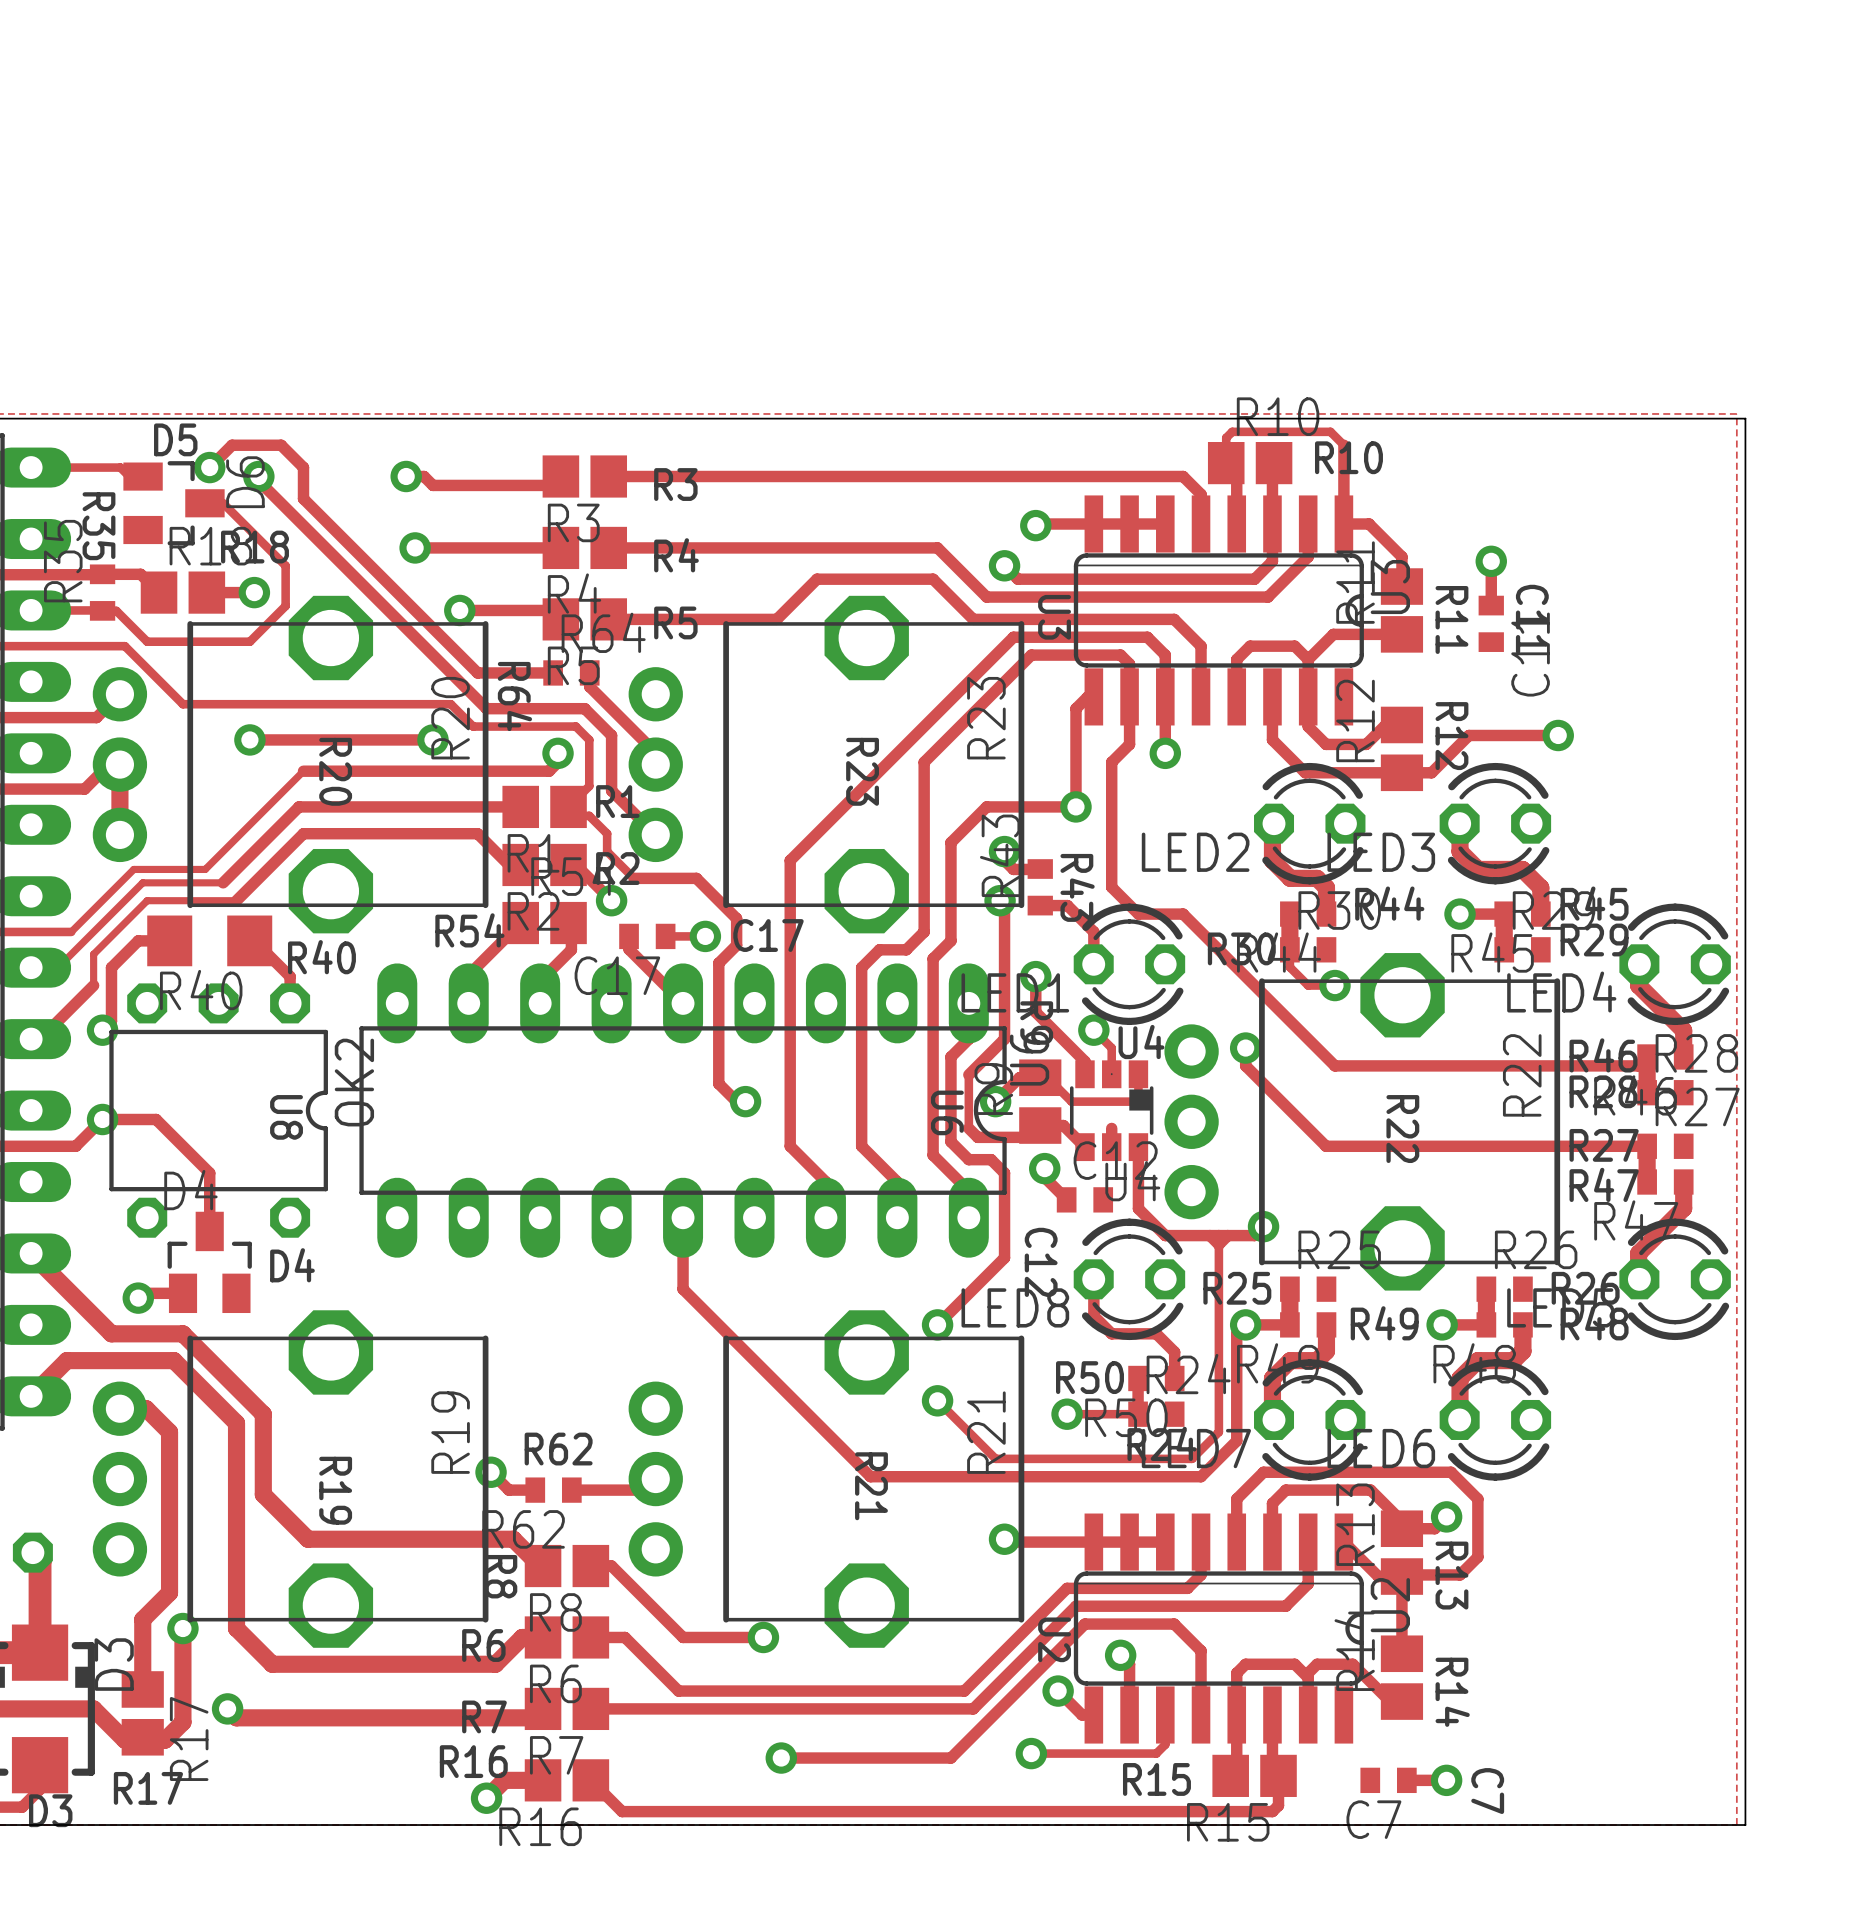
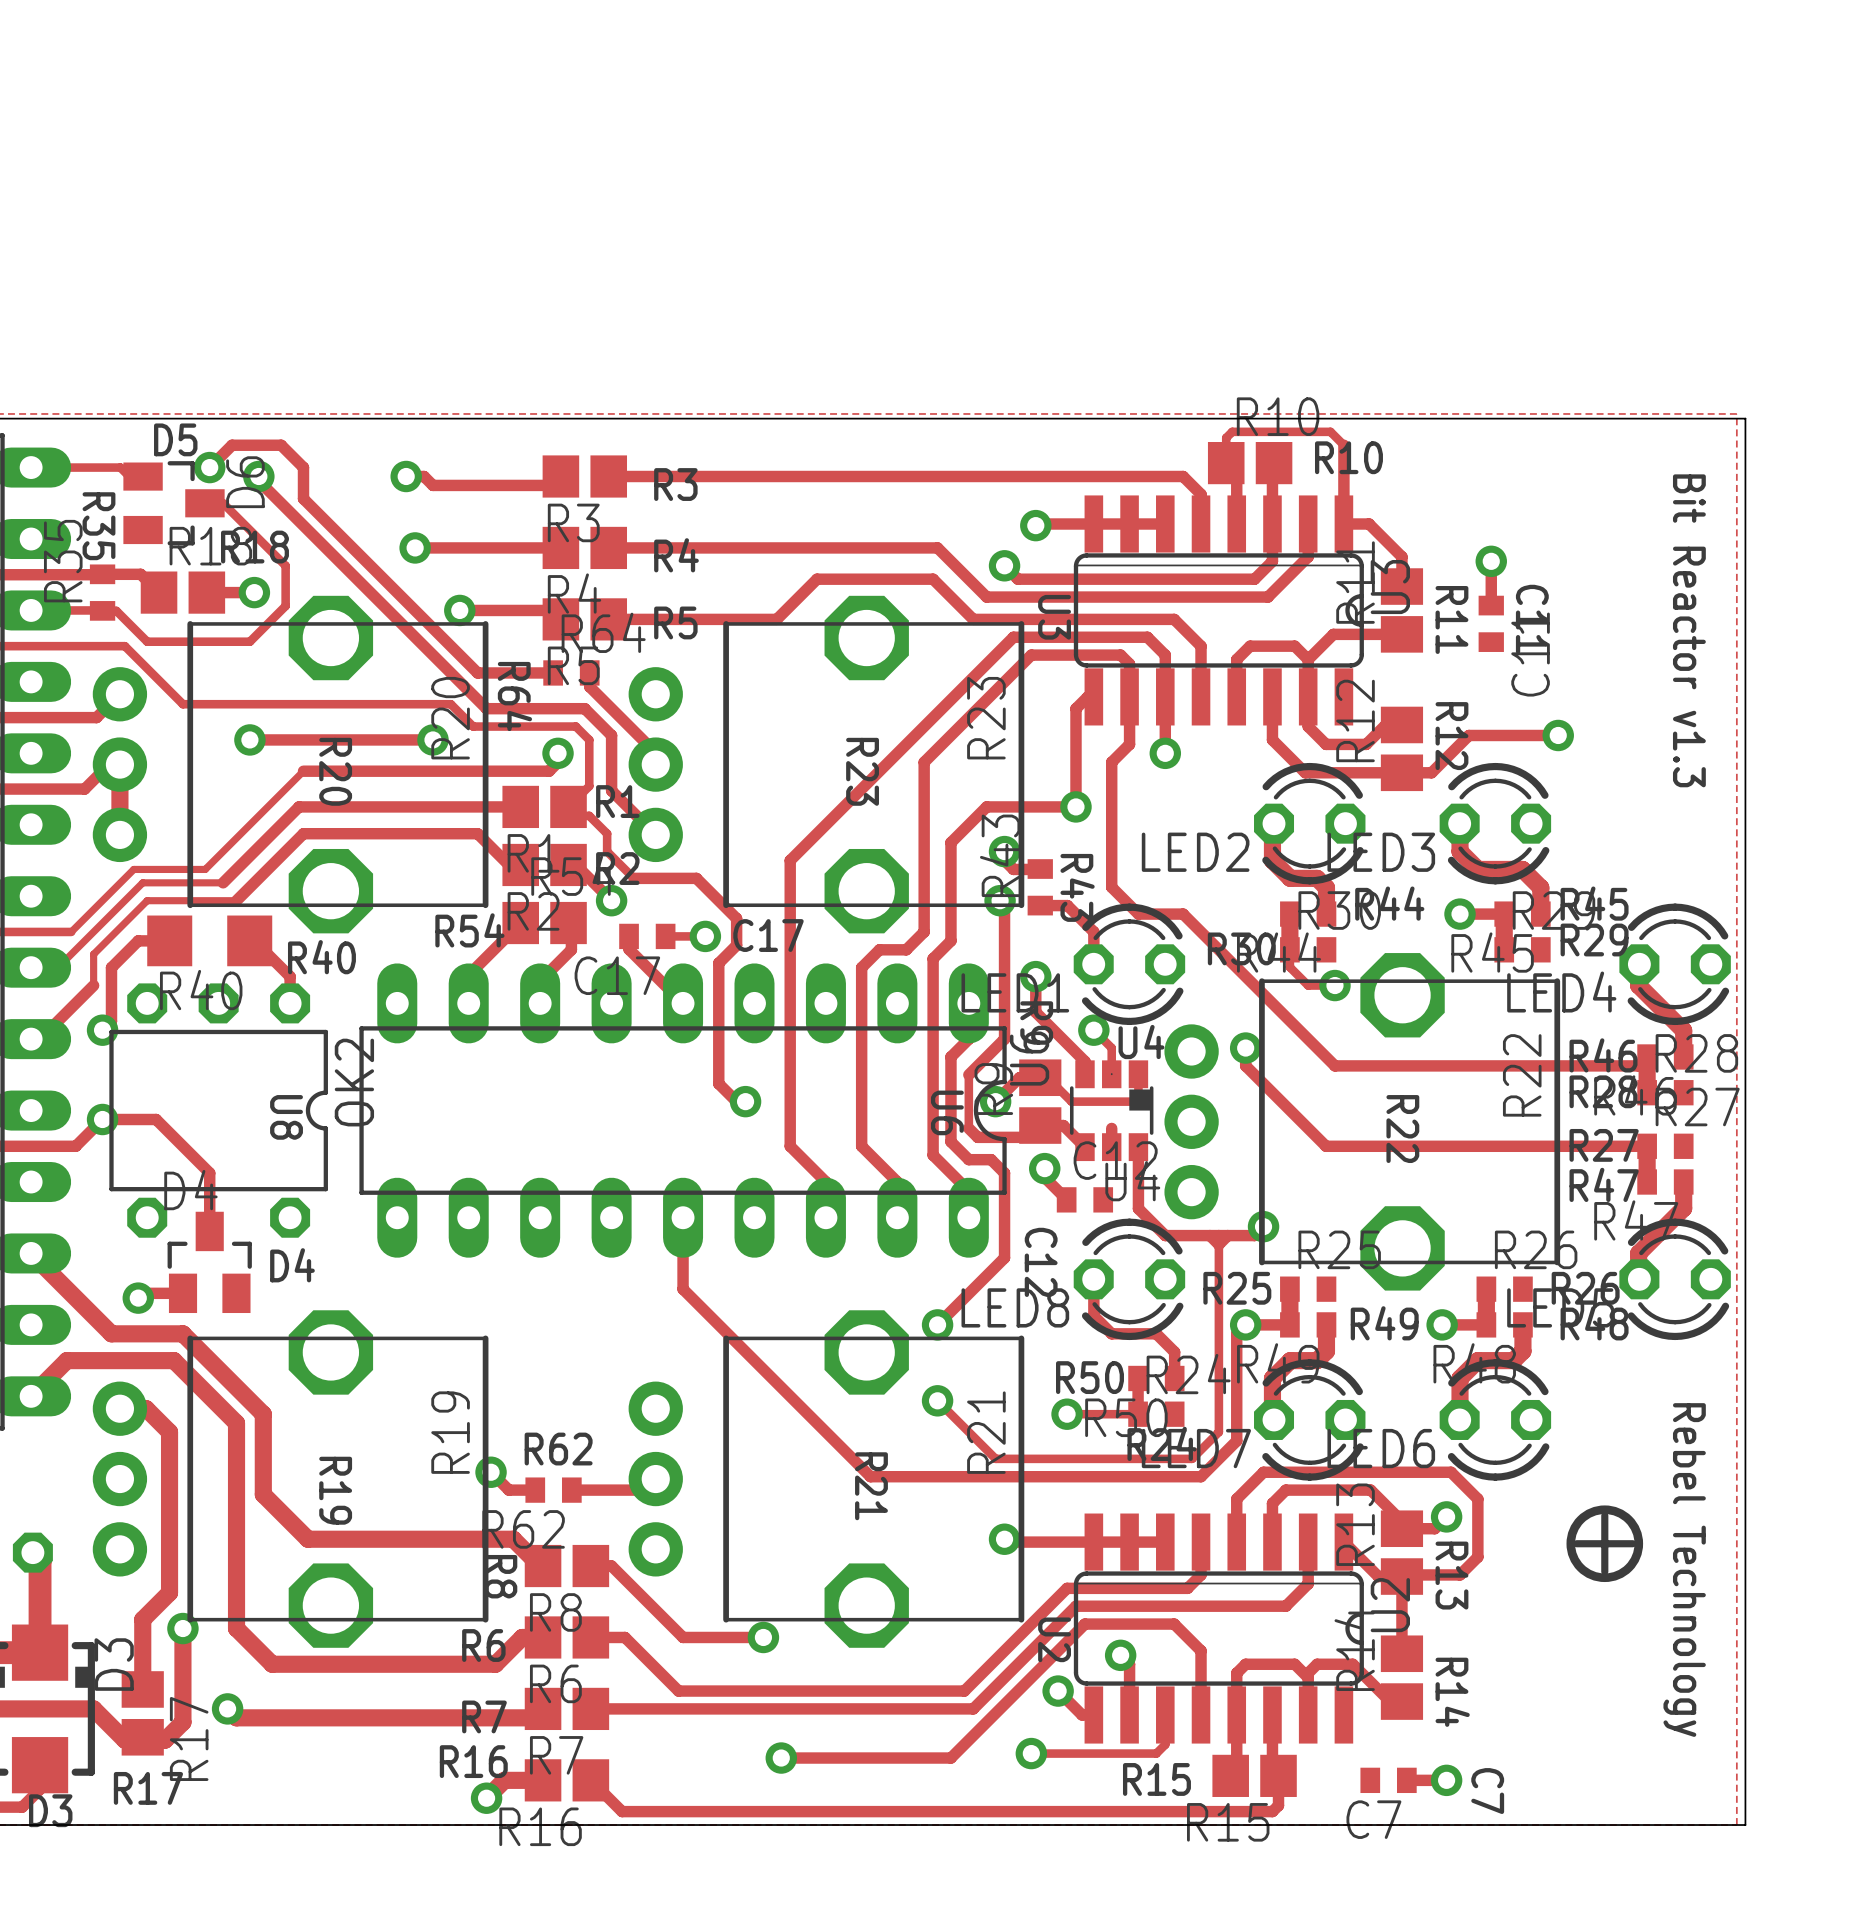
text: none -> Bit Reactor v1.3 (1689, 630)
drawing: none -> [1566, 1505, 1644, 1583]
line: none -> (1604, 1515) (1604, 1571)
line: none -> (1576, 1543) (1632, 1543)
text: none -> Rebel Technology (1684, 1570)

